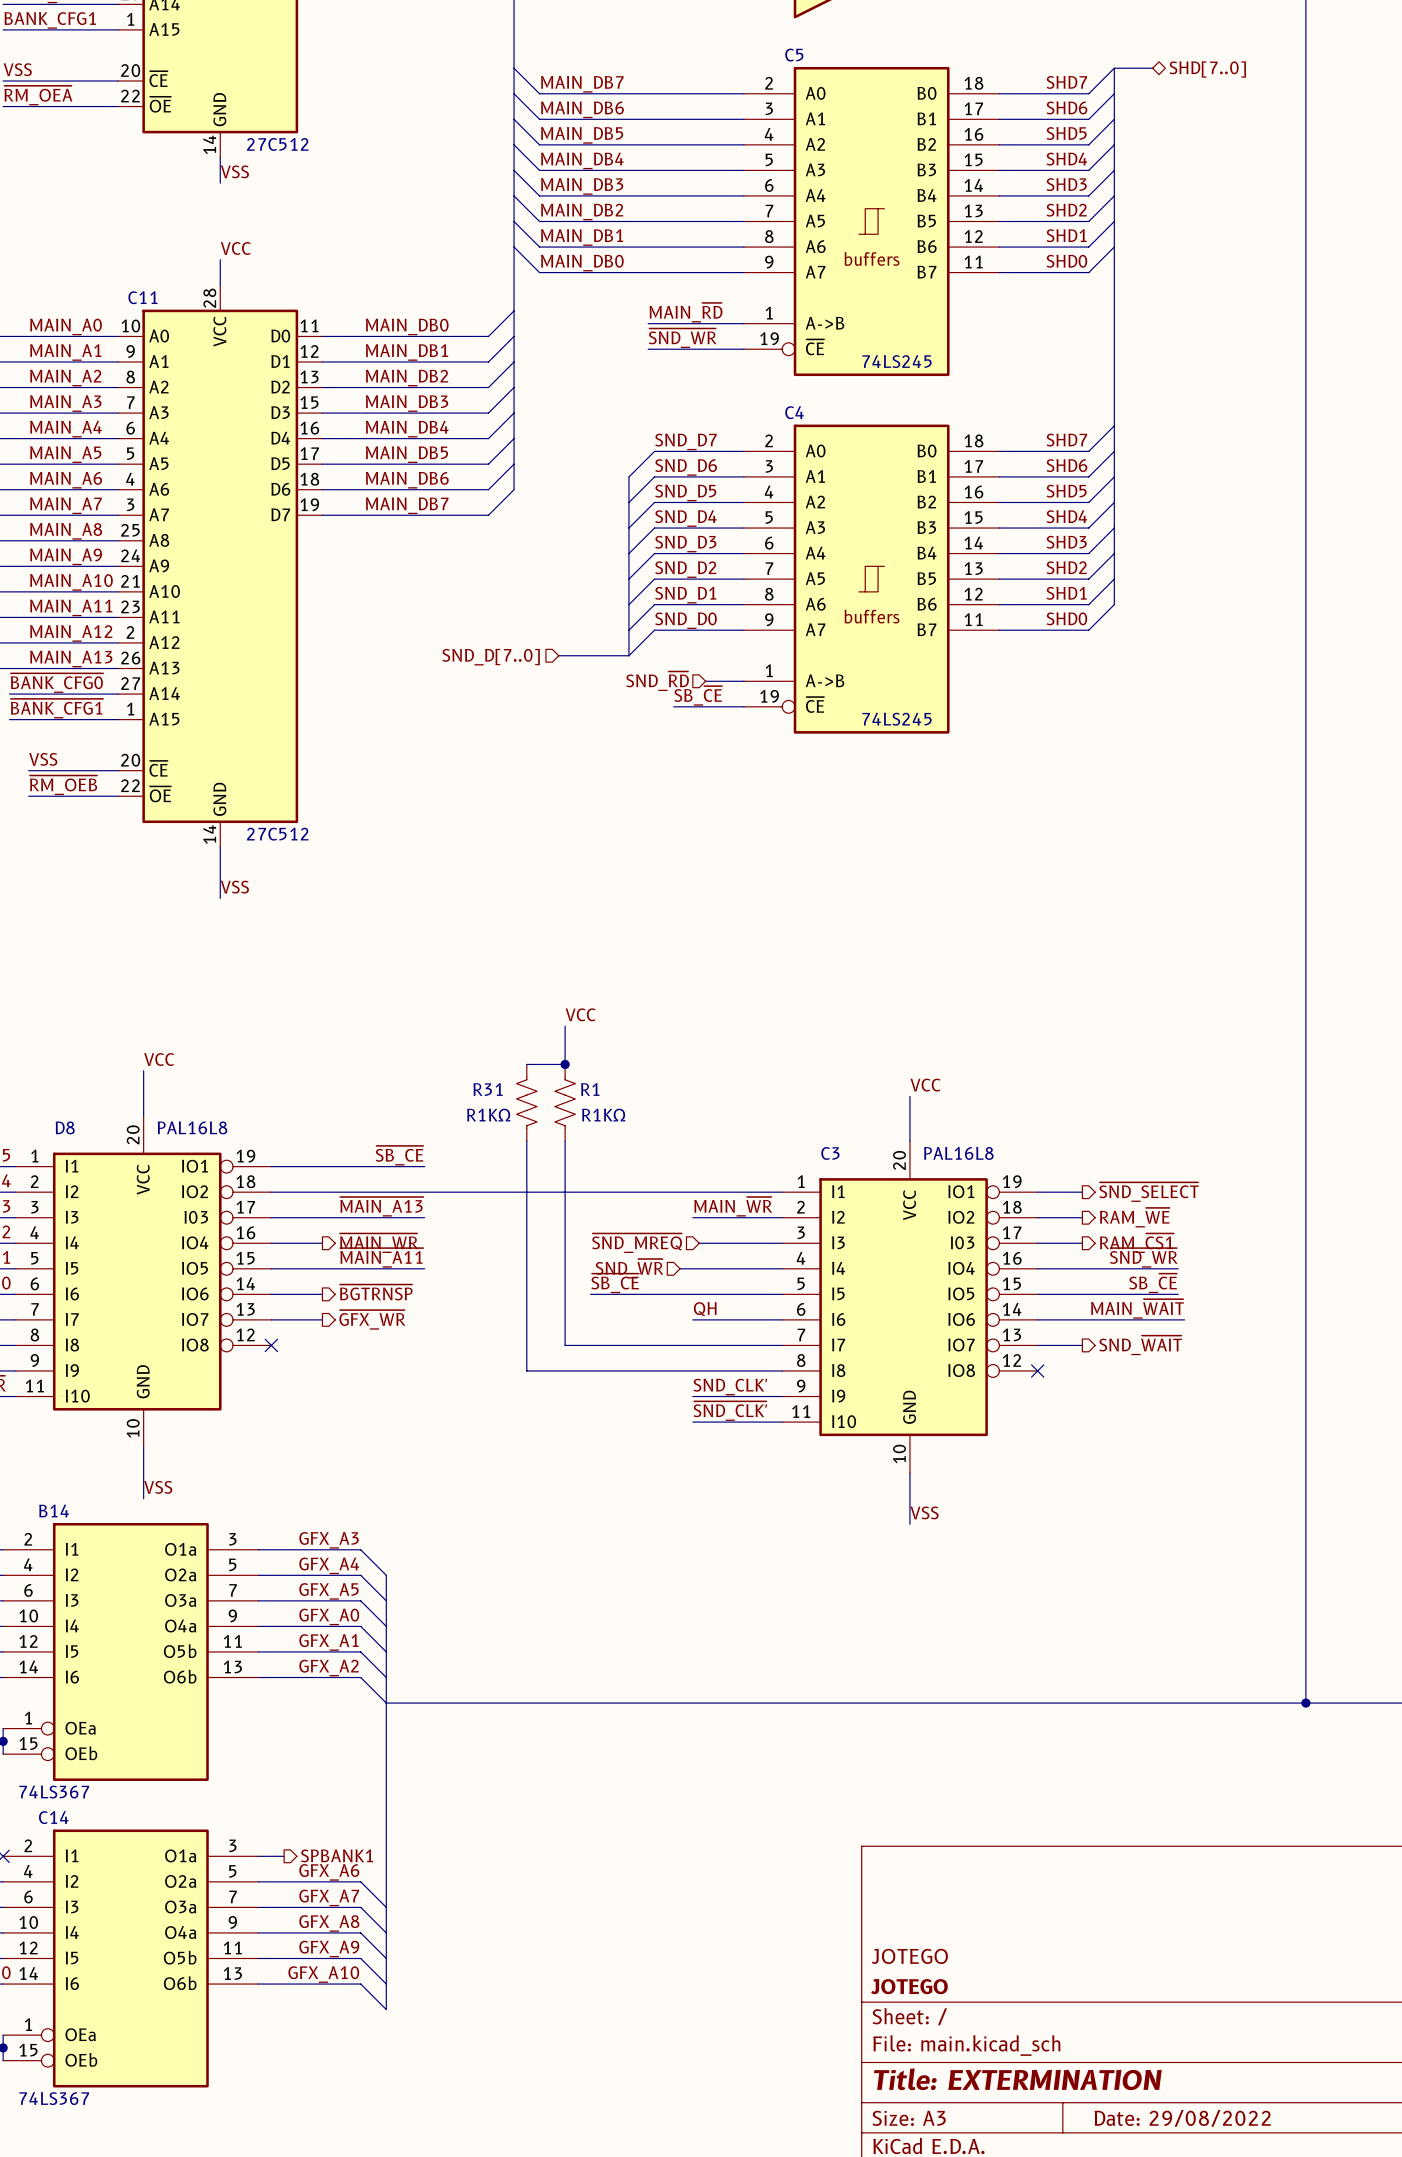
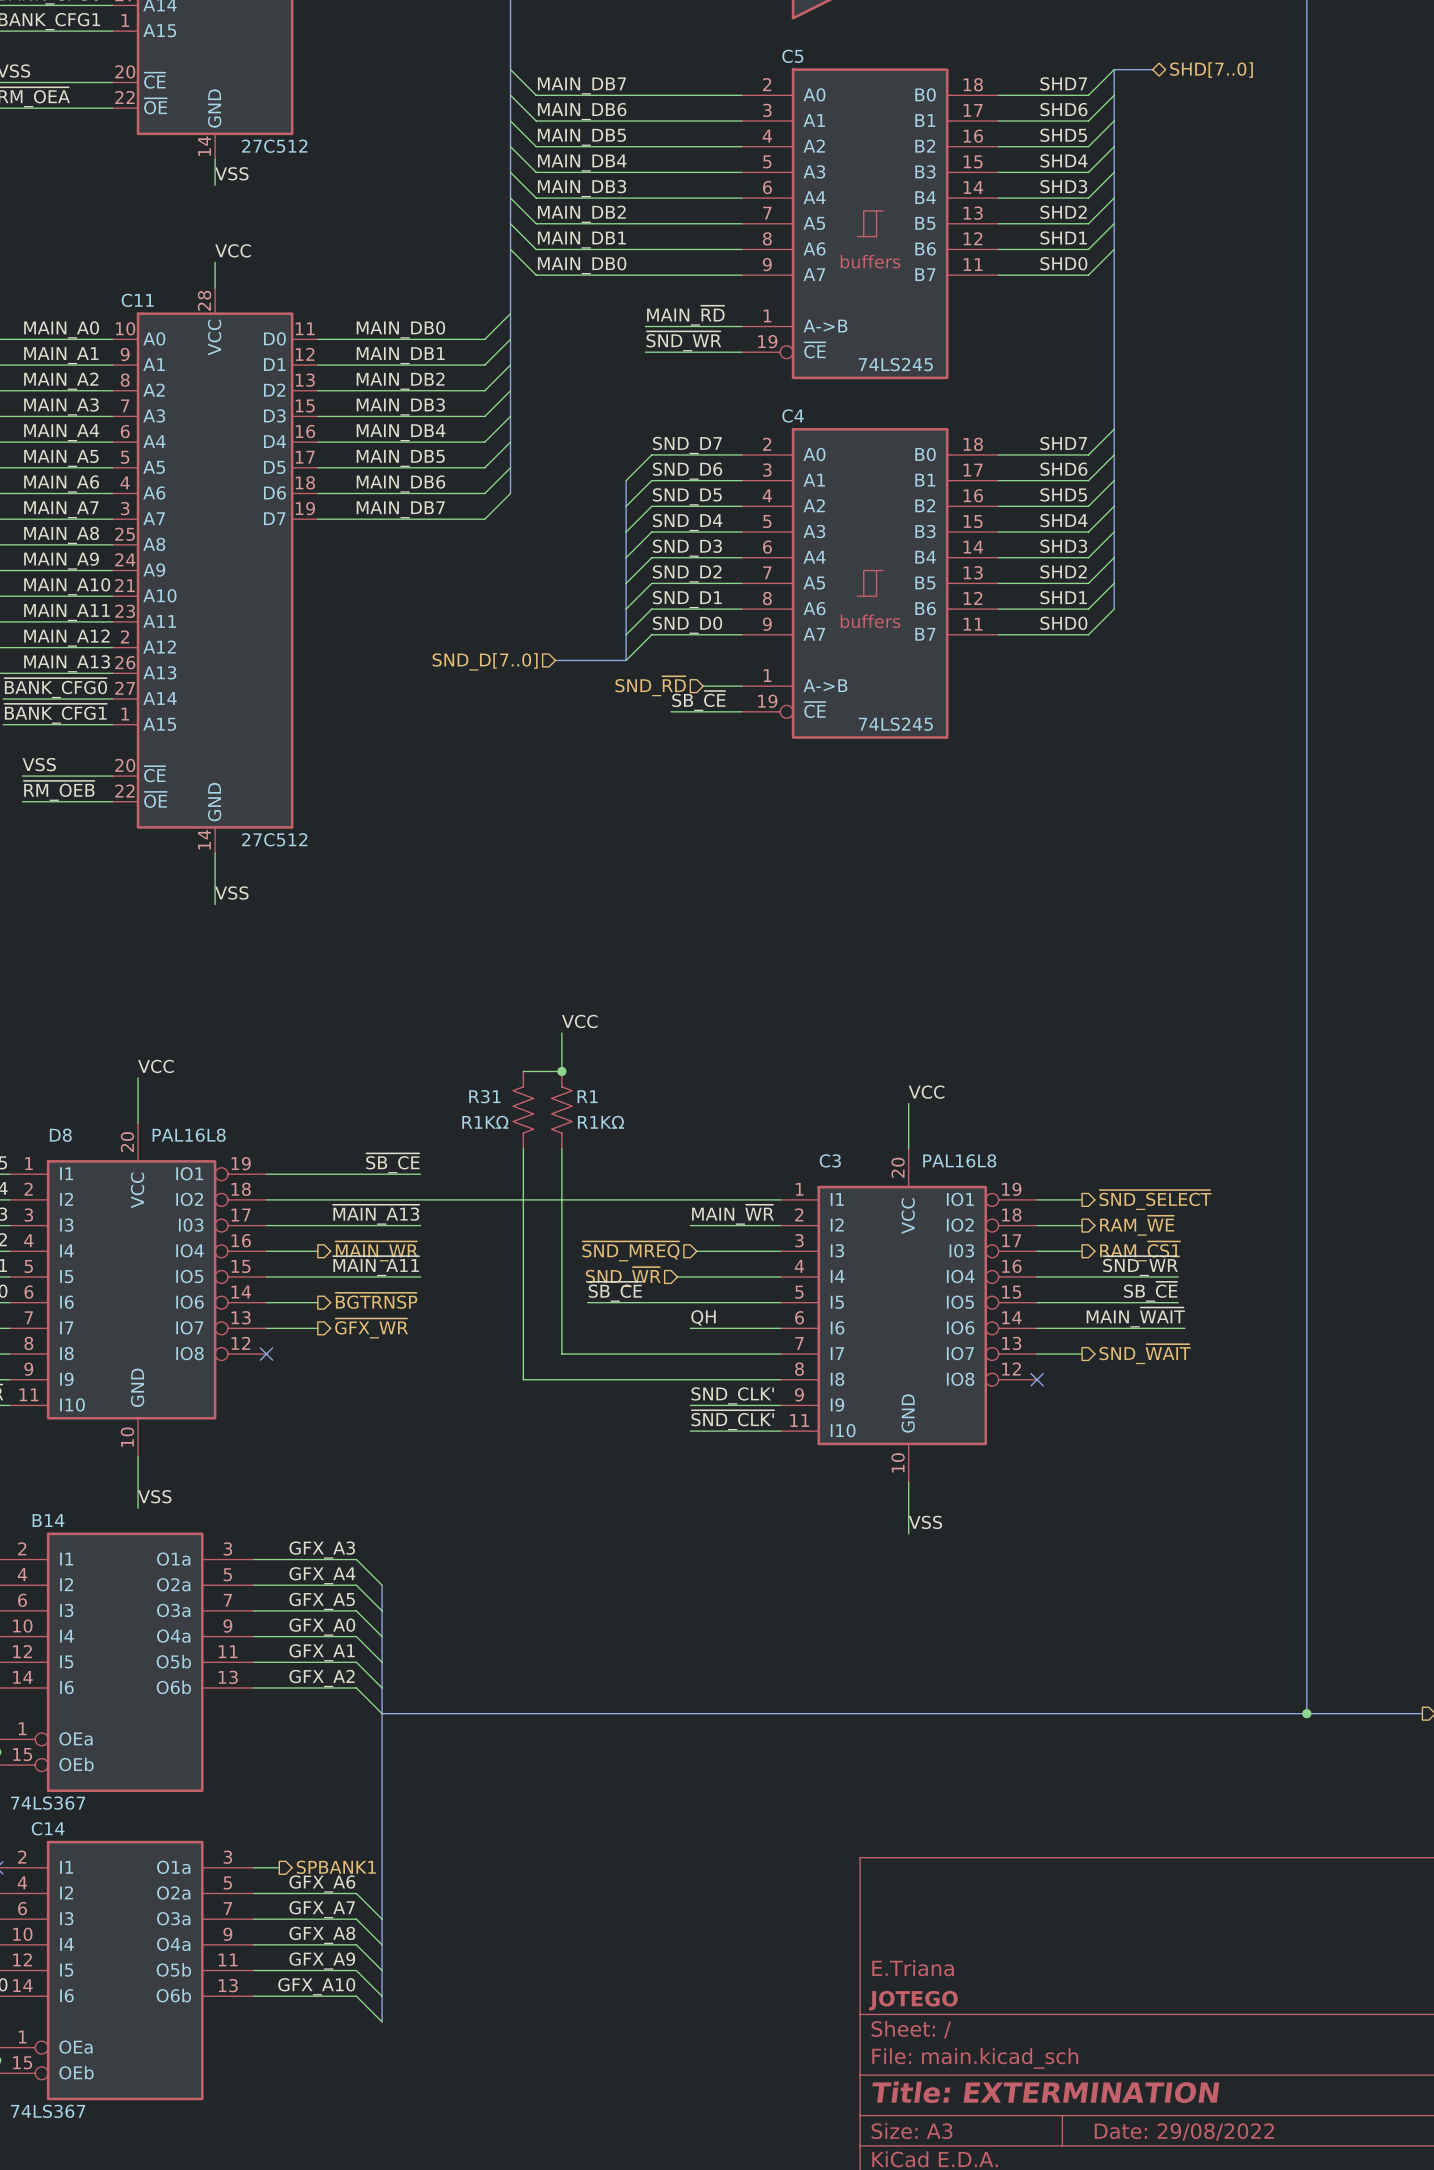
title block: JOTEGO (909, 1956) -> E.Triana (913, 1968)

